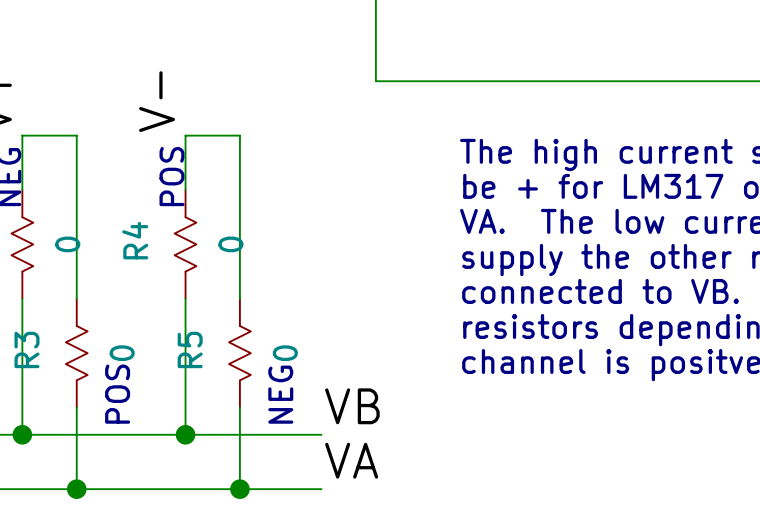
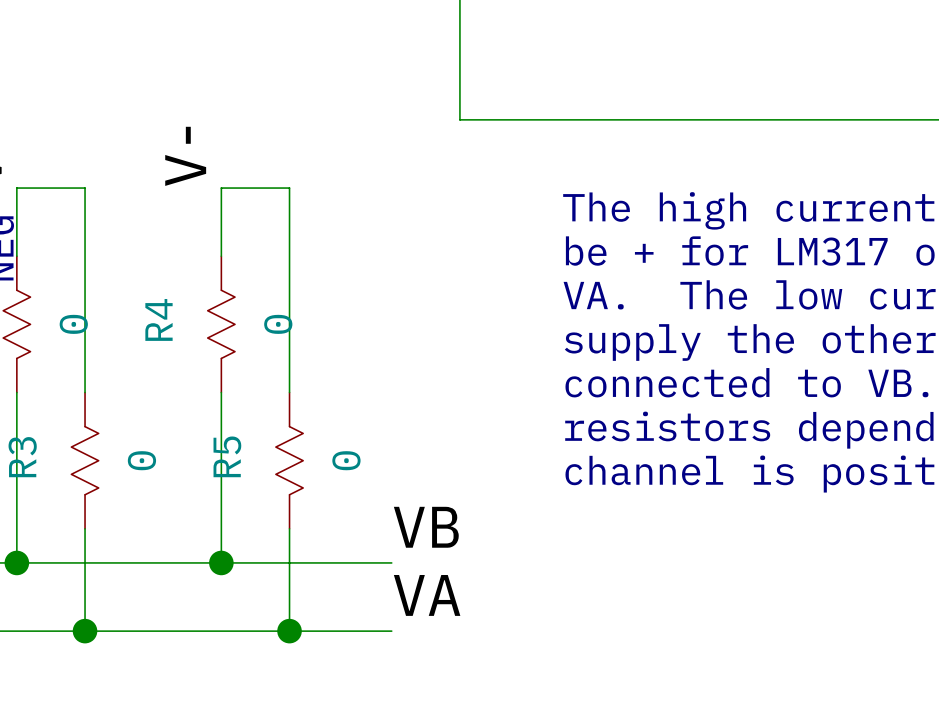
text: POS (171, 176) -> none
text: POS (117, 394) -> none
text: NEG (280, 394) -> none

